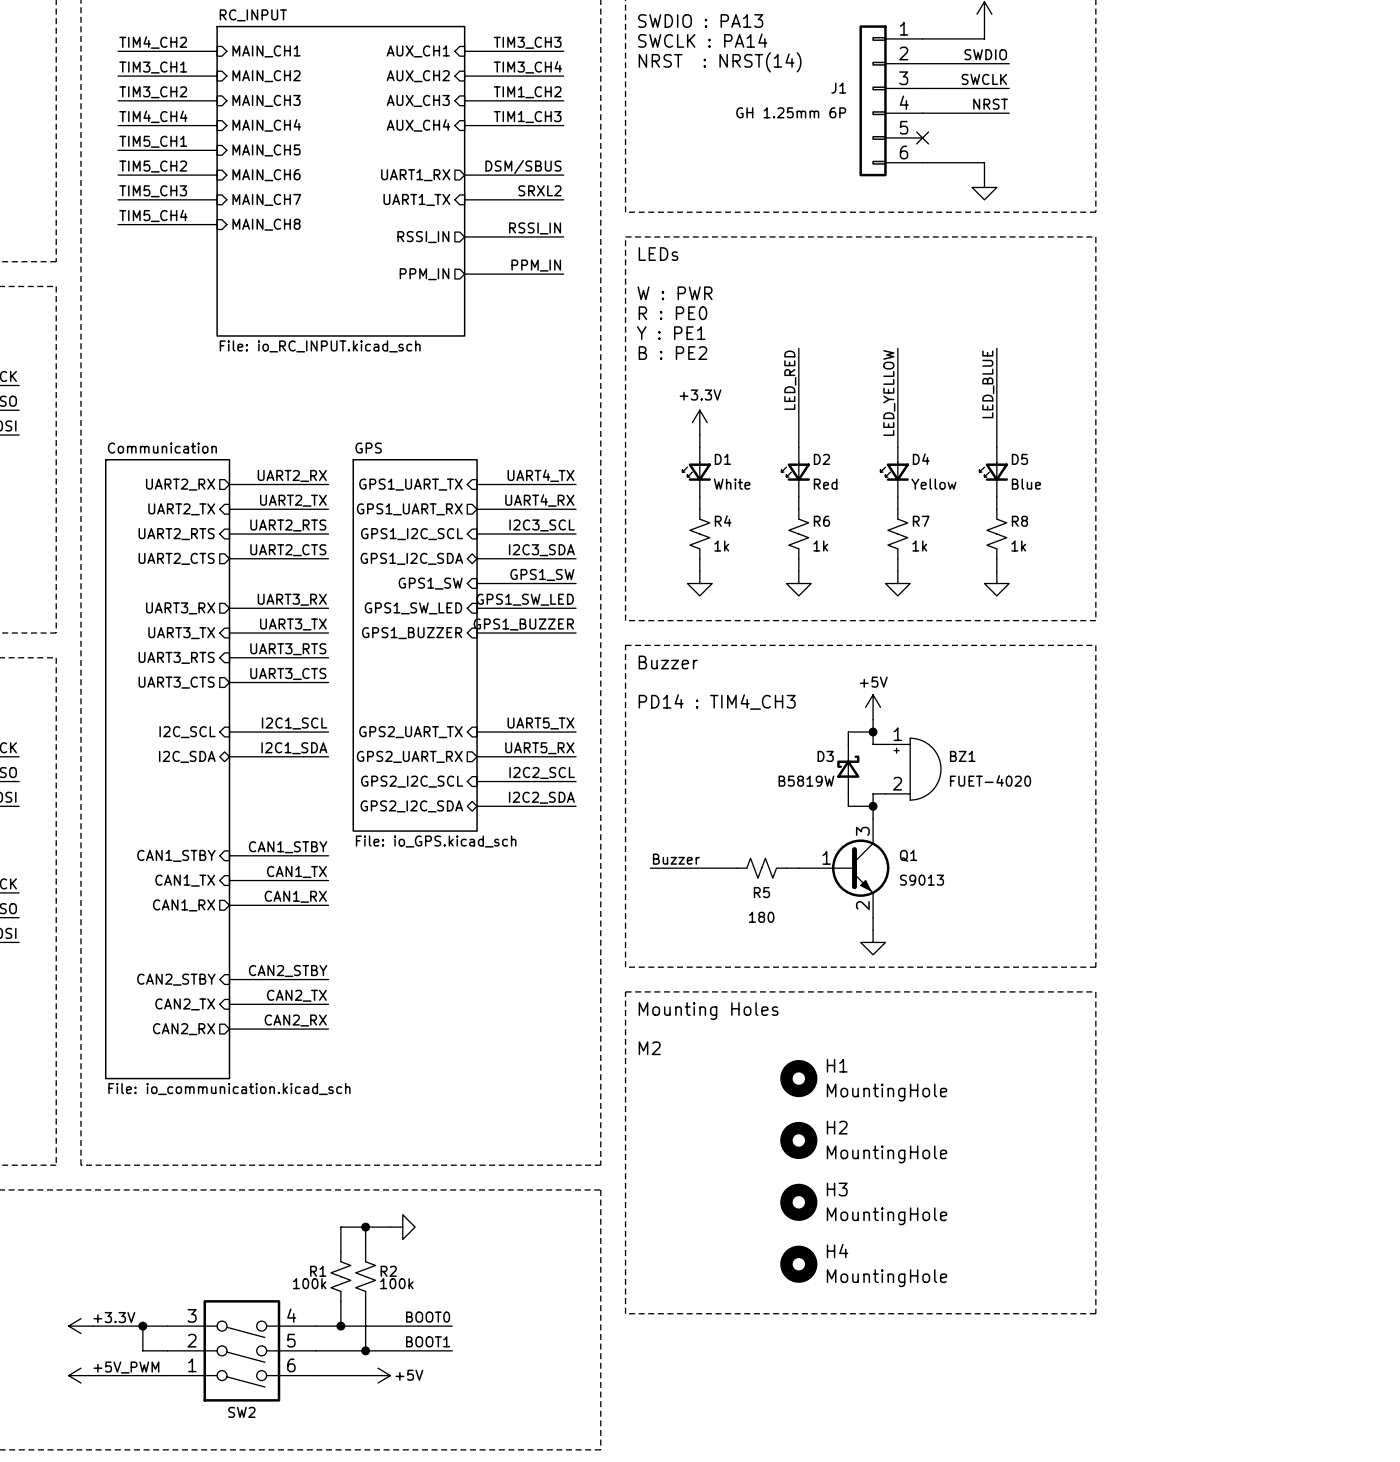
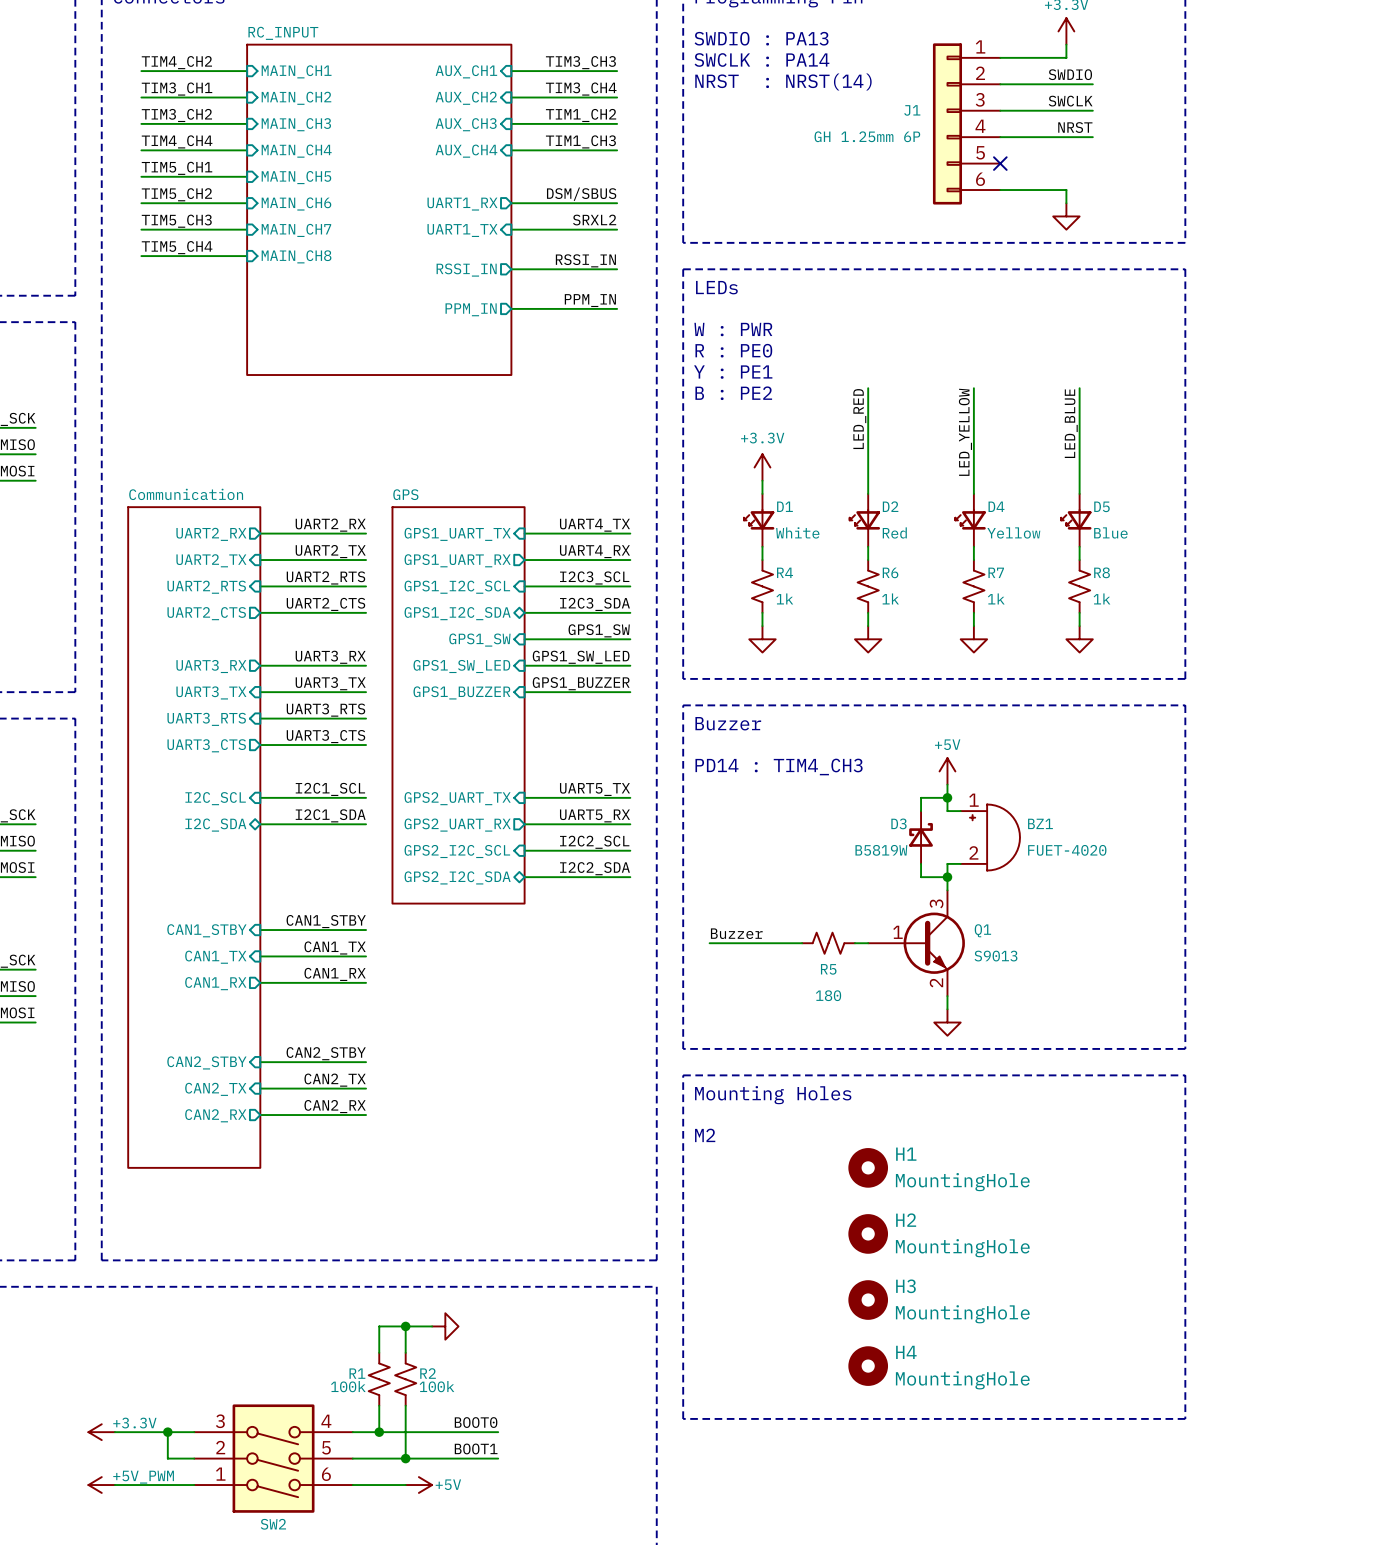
sheet RC_INPUT value: File: io_RC_INPUT.kicad_sch (320, 346) -> none
sheet GPS value: File: io_GPS.kicad_sch (436, 841) -> none
sheet Communication value: File: io_communication.kicad_sch (229, 1089) -> none

